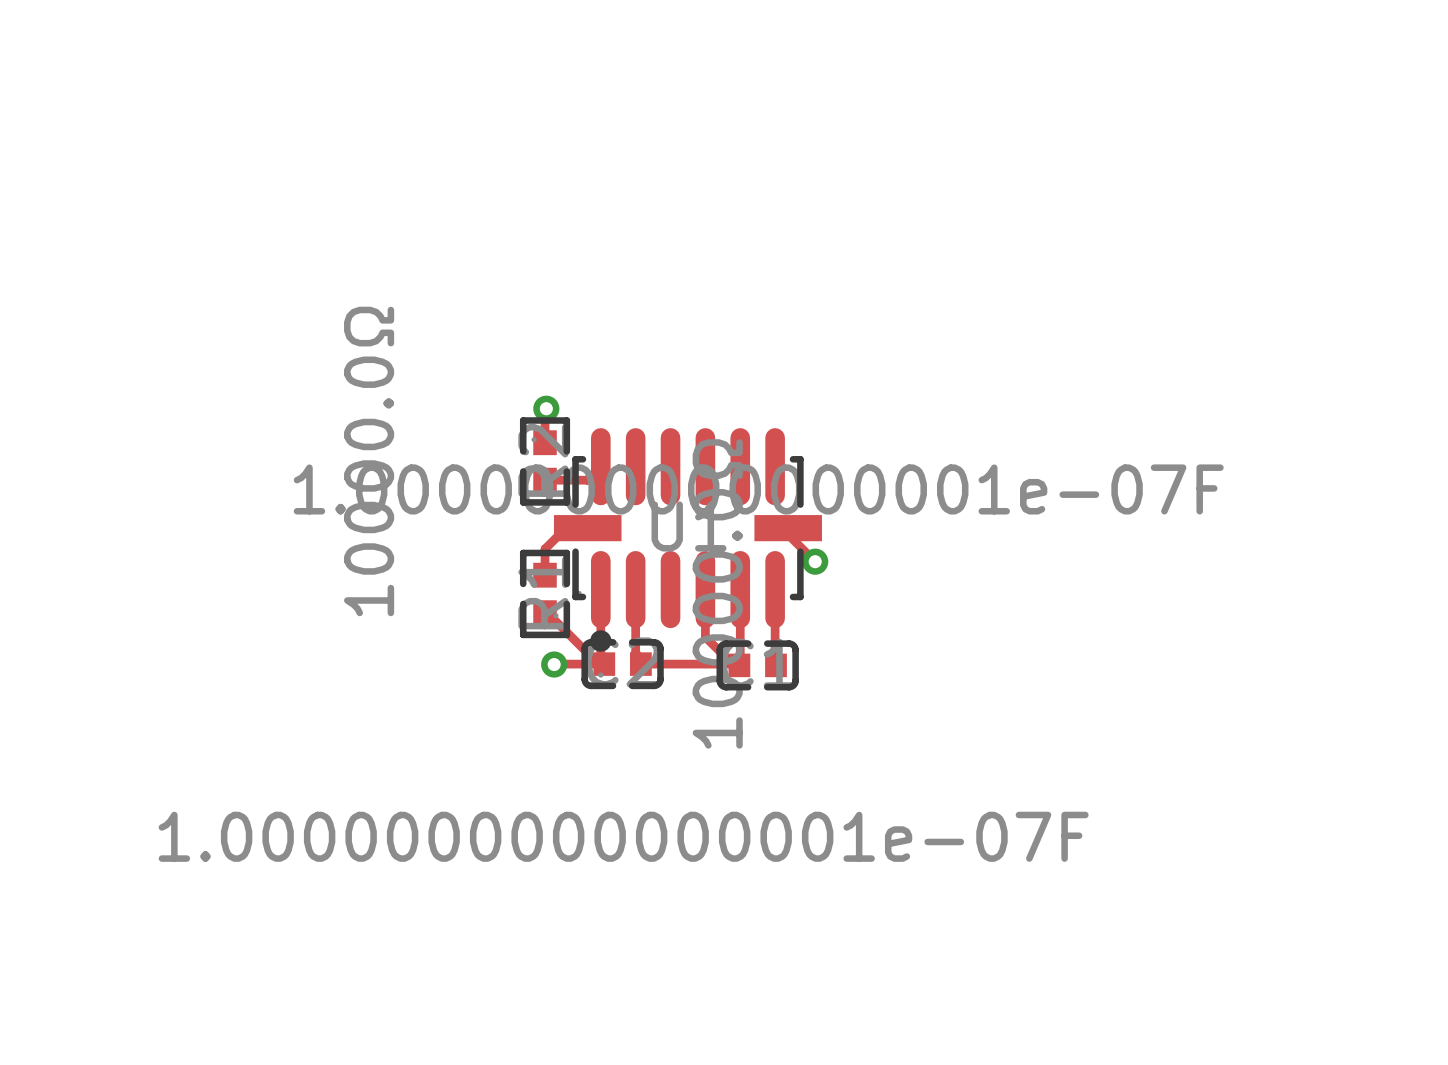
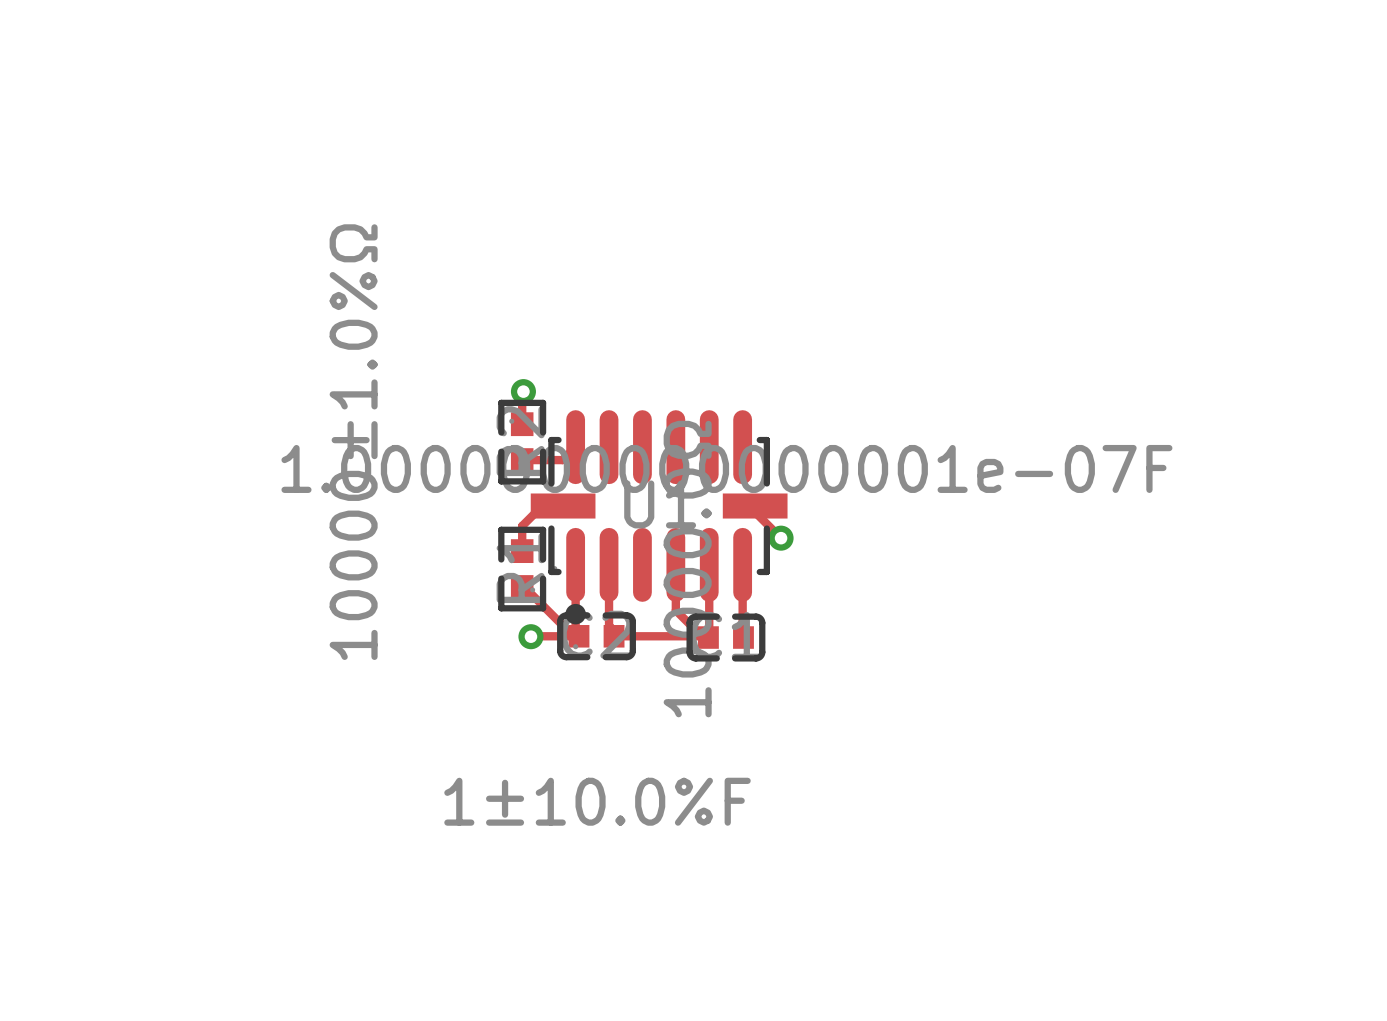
part value: 10000.0Ω (369, 461) -> 10000±1.0%Ω (353, 442)
part value: 1.0000000000000001e-07F (623, 836) -> 1±10.0%F (597, 801)

